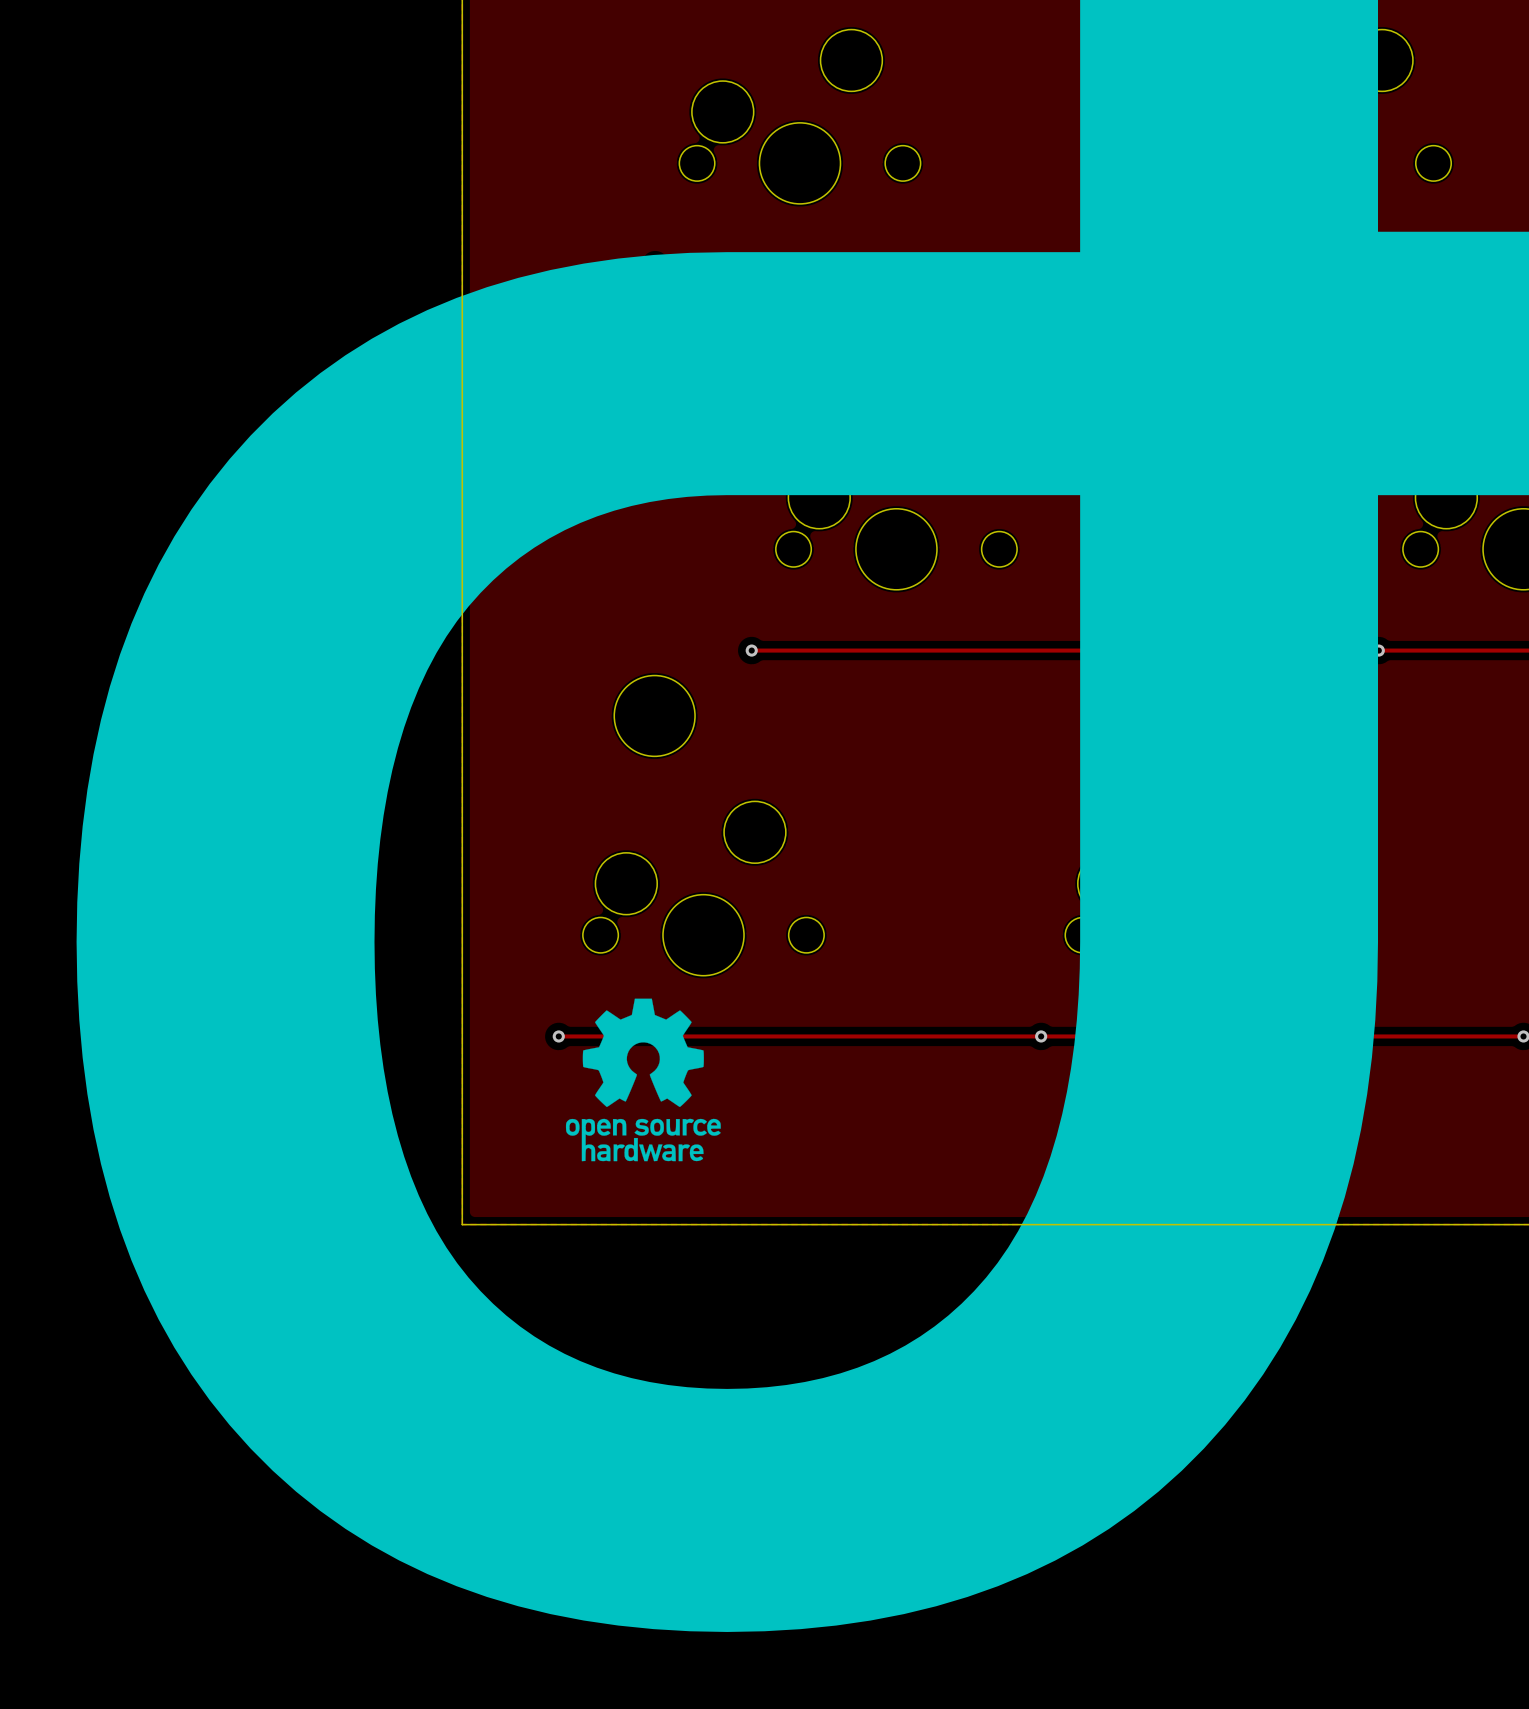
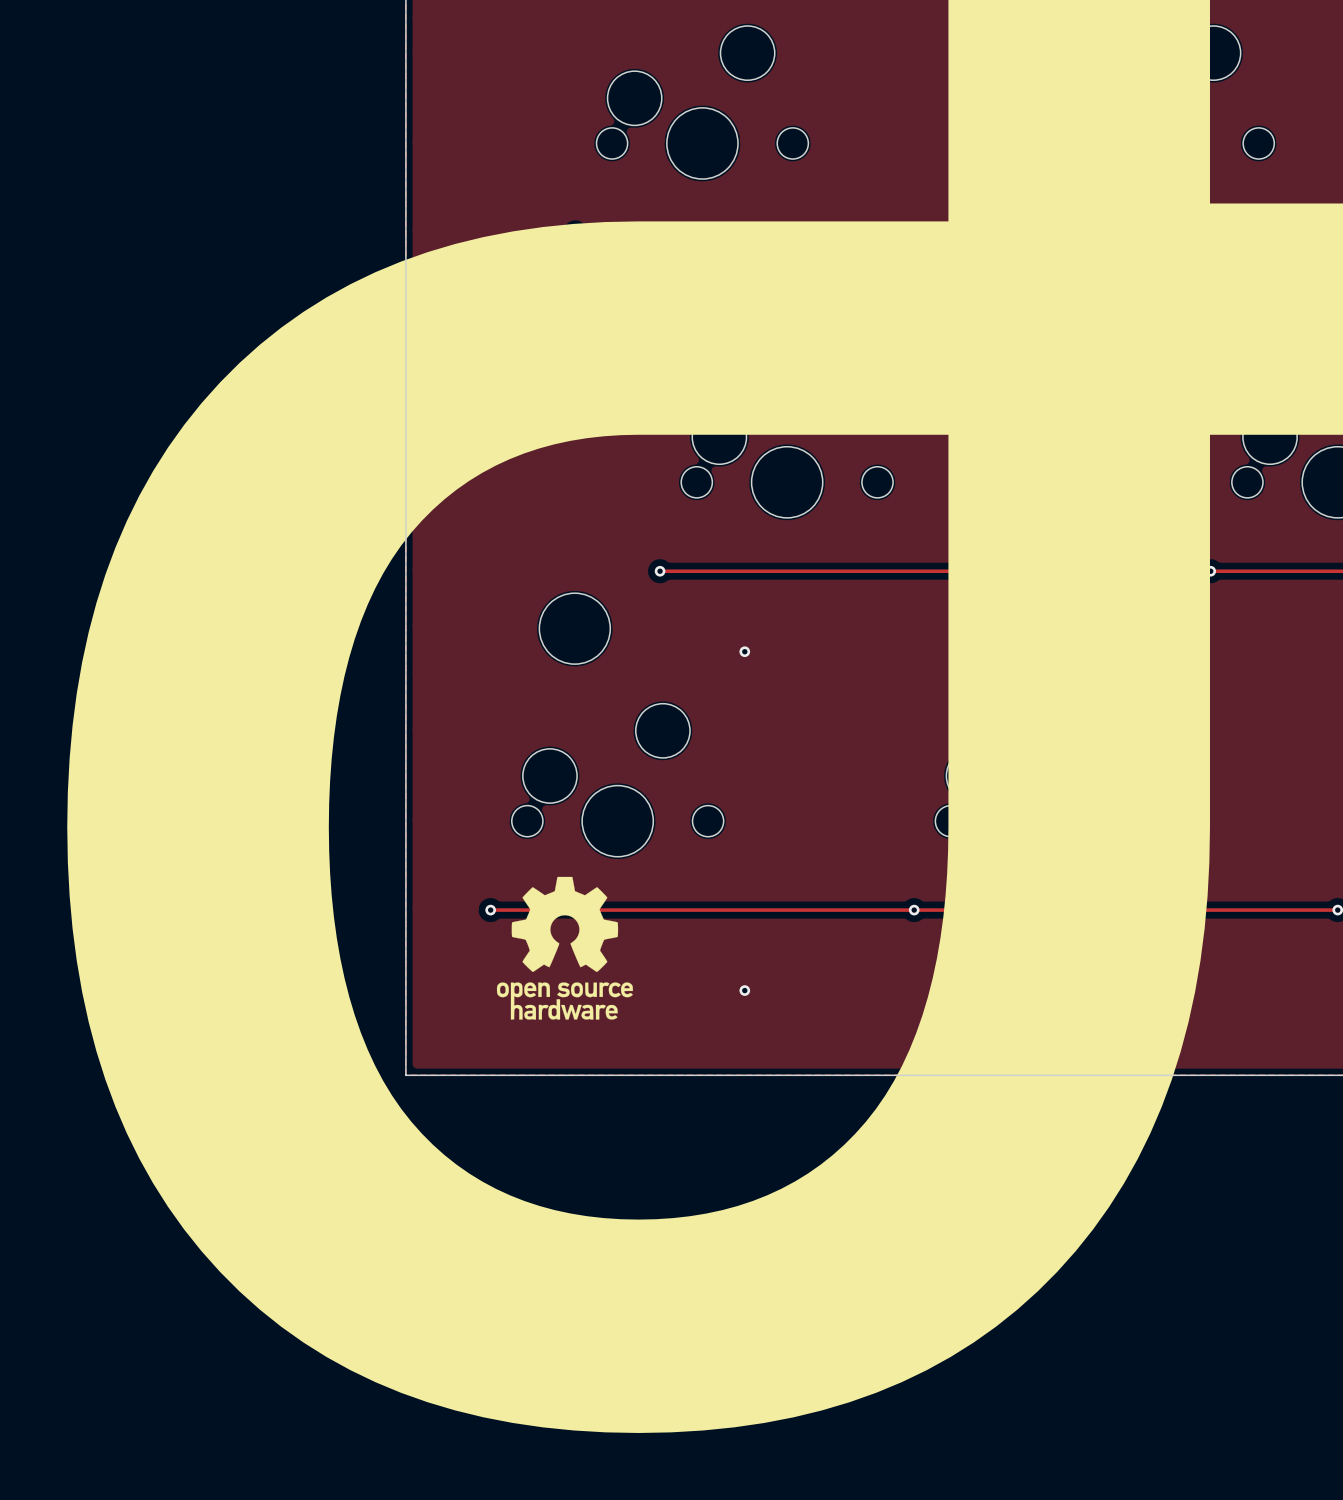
via: none -> (744, 651)
via: none -> (744, 990)

